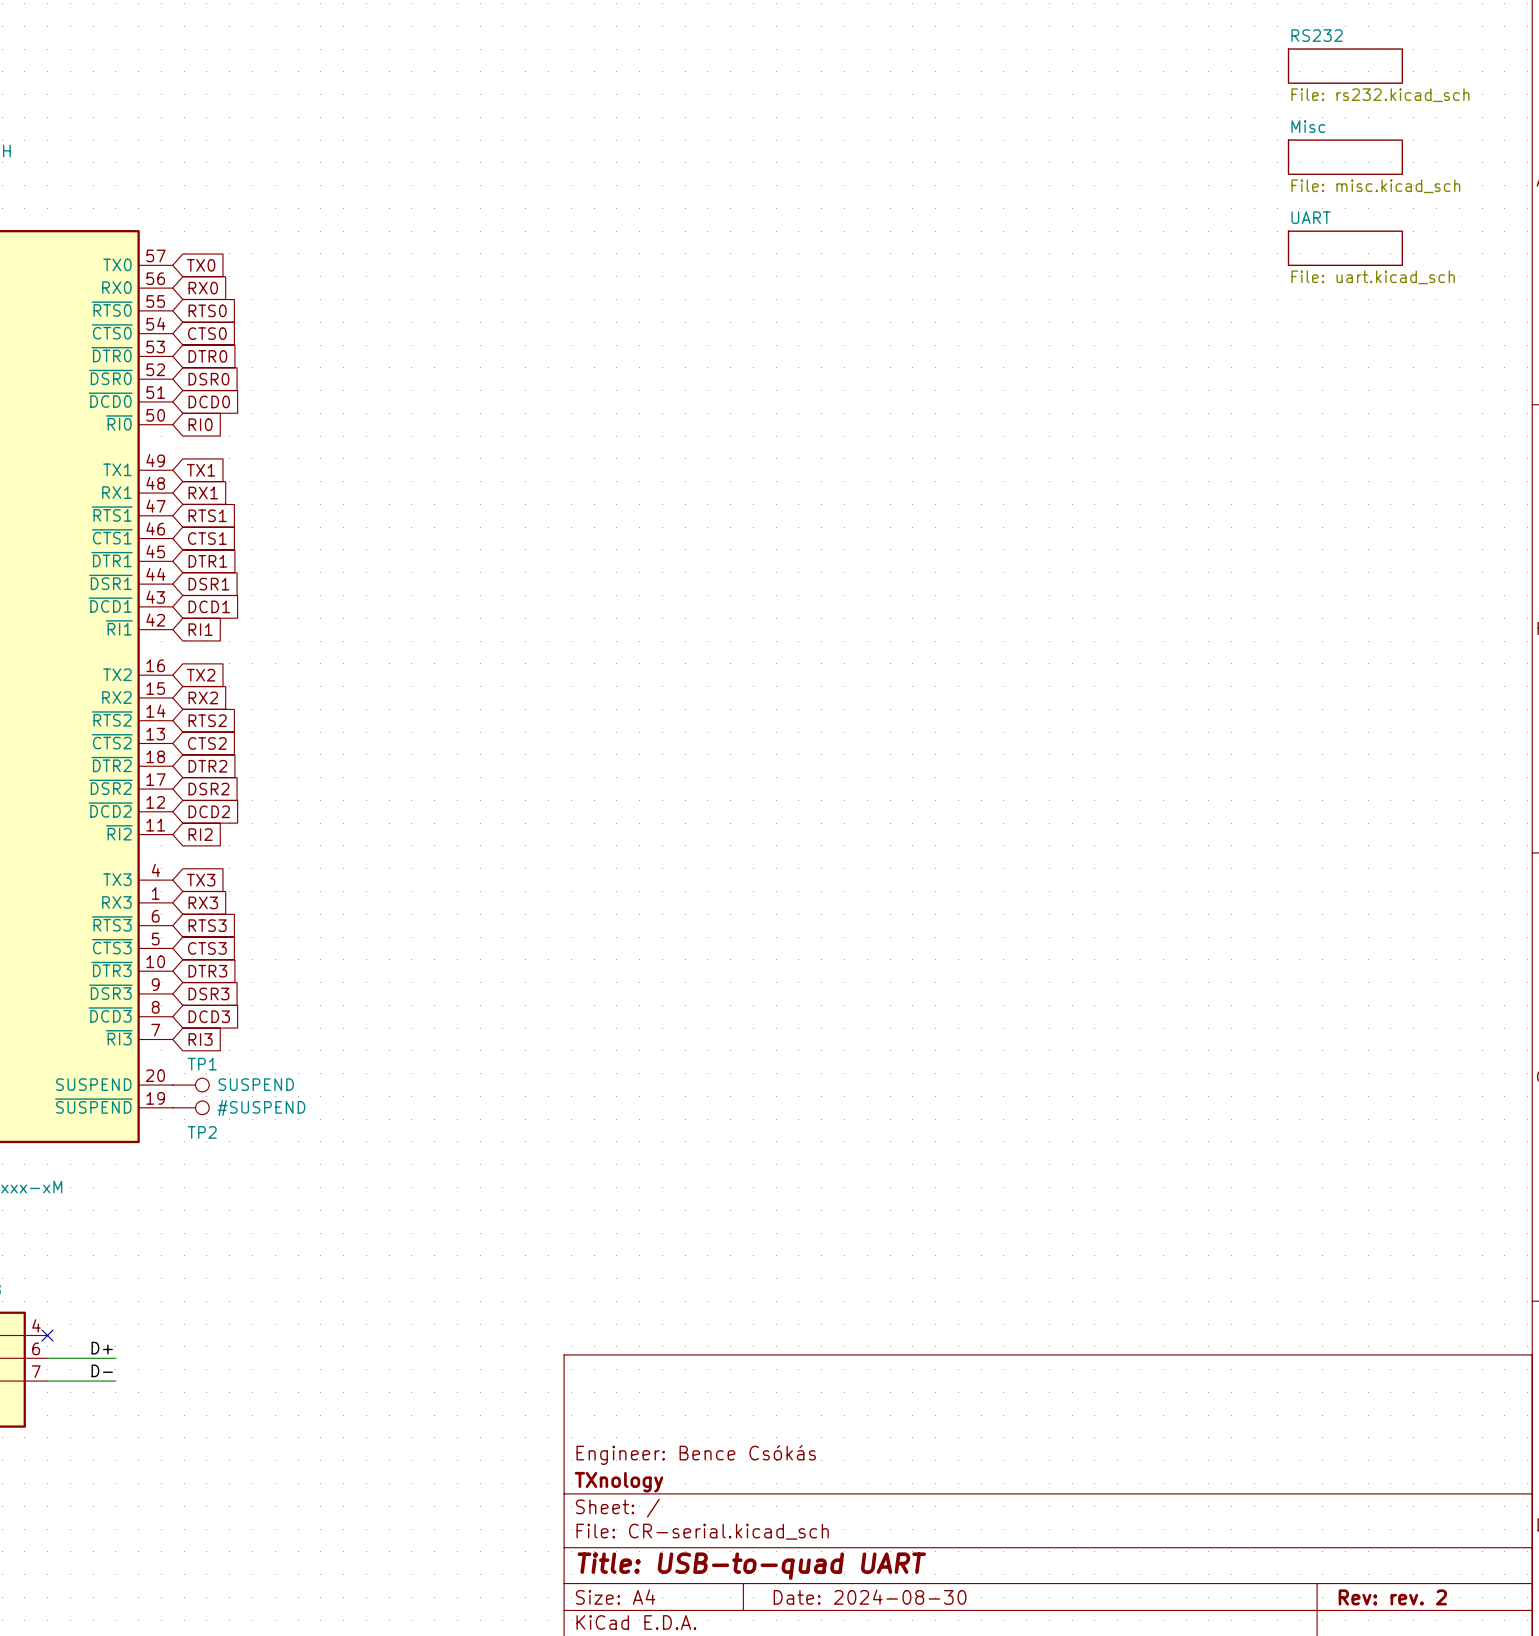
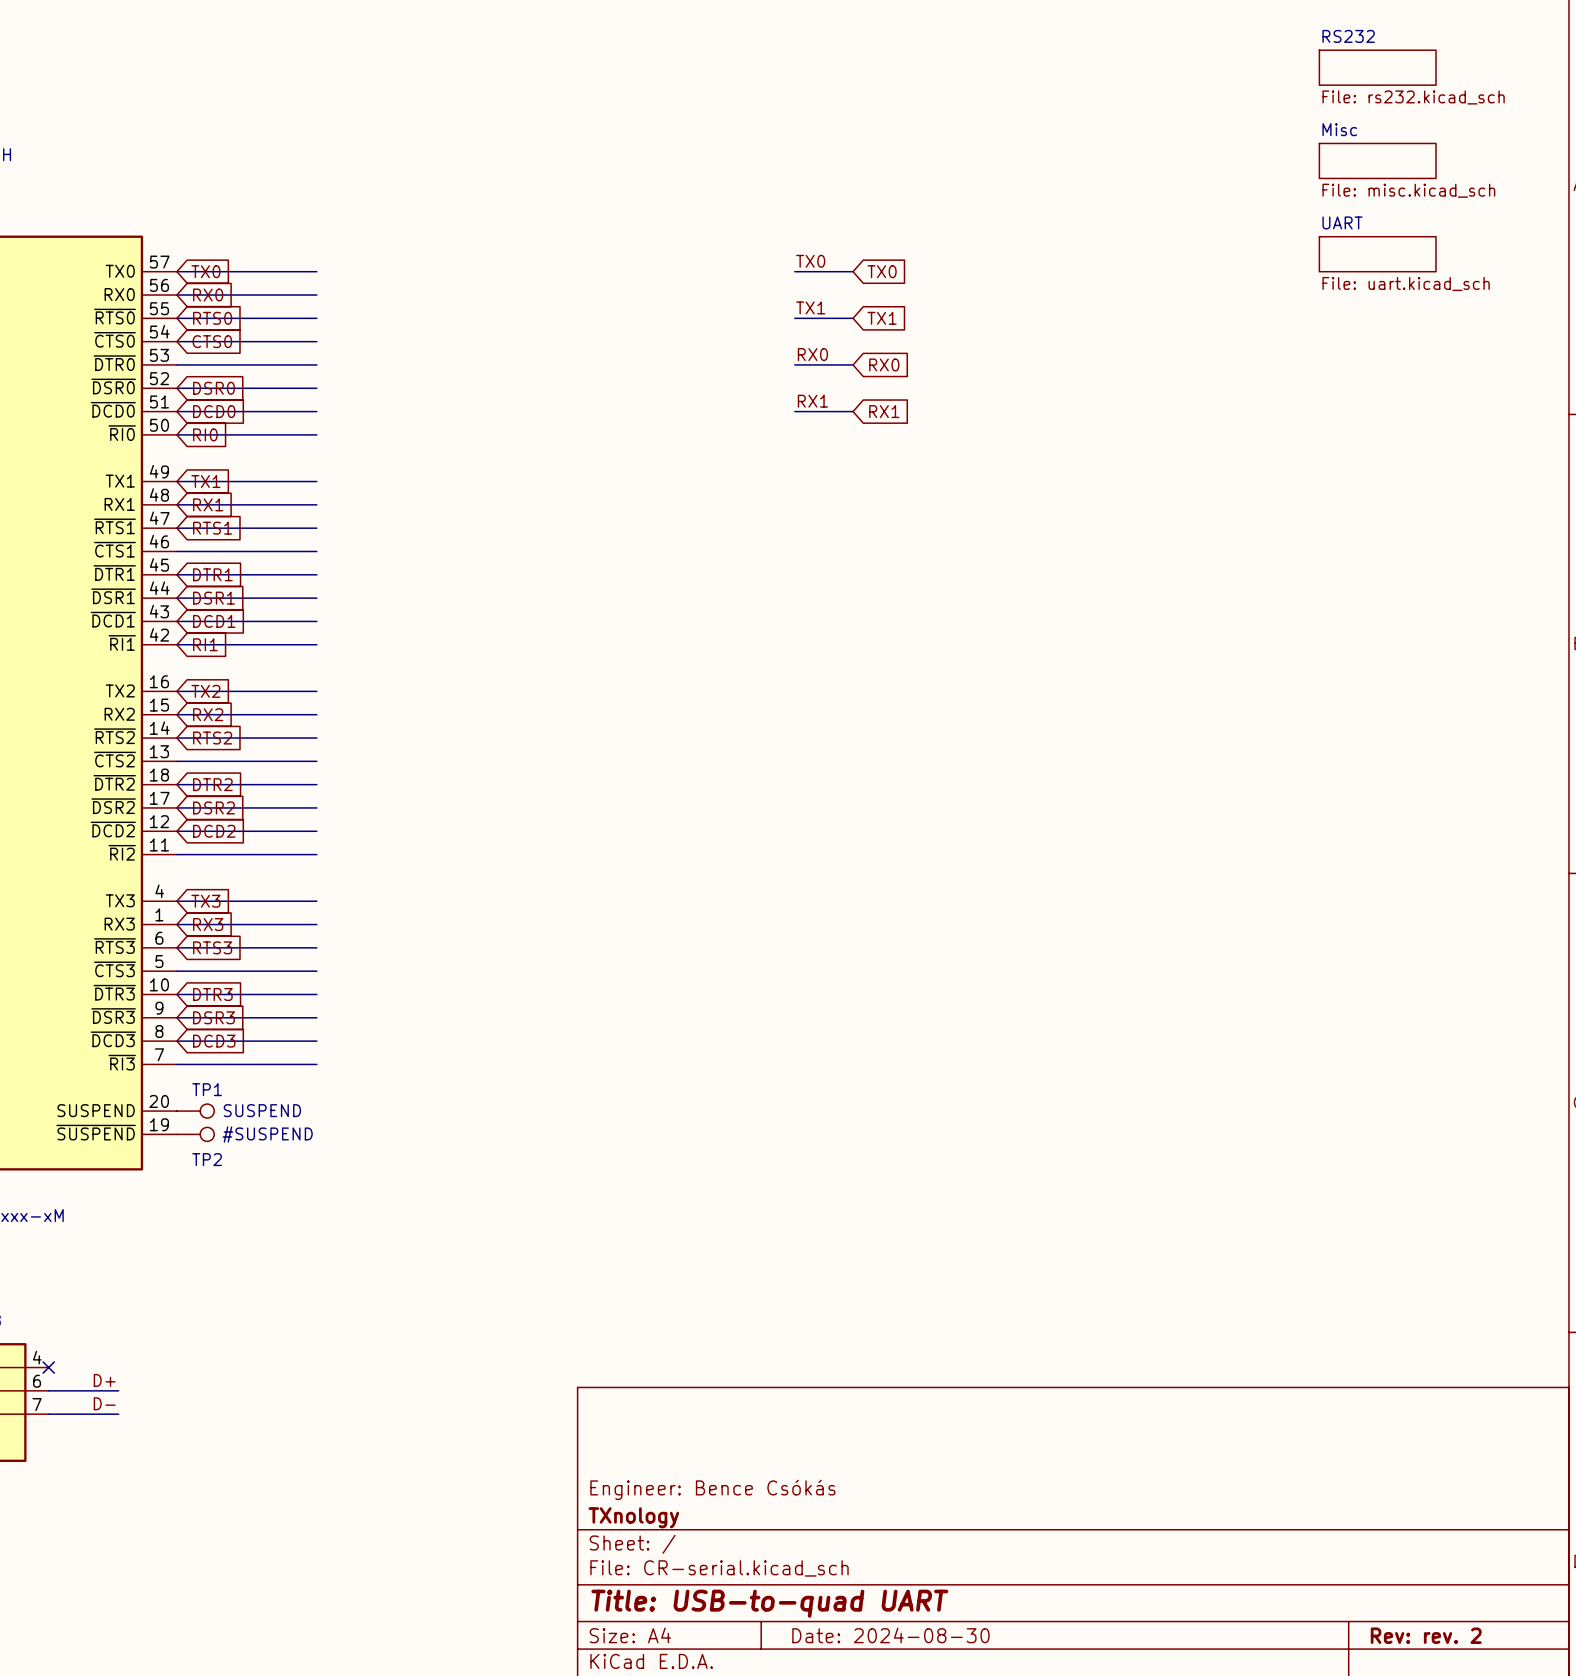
label: none -> TX0 (810, 261)
wire: none -> (176, 271) (316, 271)
wire: none -> (794, 271) (853, 271)
global label: none -> TX0 (882, 271)
wire: none -> (176, 295) (316, 295)
label: none -> TX1 (810, 307)
wire: none -> (176, 318) (316, 318)
wire: none -> (794, 318) (853, 318)
global label: none -> TX1 (882, 318)
wire: none -> (176, 341) (316, 341)
label: none -> RX0 (812, 354)
wire: none -> (176, 364) (316, 364)
global label: DTR0 (207, 356) -> none
wire: none -> (794, 364) (853, 364)
global label: none -> RX0 (884, 364)
wire: none -> (176, 388) (316, 388)
label: none -> RX1 (812, 401)
wire: none -> (176, 411) (316, 411)
wire: none -> (794, 411) (853, 411)
global label: none -> RX1 (884, 411)
wire: none -> (176, 434) (316, 434)
wire: none -> (176, 481) (316, 481)
wire: none -> (176, 504) (316, 504)
wire: none -> (176, 528) (316, 528)
wire: none -> (176, 551) (316, 551)
global label: CTS1 (207, 538) -> none
wire: none -> (176, 574) (316, 574)
wire: none -> (176, 598) (316, 598)
wire: none -> (176, 621) (316, 621)
wire: none -> (176, 644) (316, 644)
wire: none -> (176, 691) (316, 691)
wire: none -> (176, 714) (316, 714)
wire: none -> (176, 738) (316, 738)
wire: none -> (176, 761) (316, 761)
global label: CTS2 (207, 743) -> none
wire: none -> (176, 784) (316, 784)
wire: none -> (176, 807) (316, 807)
wire: none -> (176, 831) (316, 831)
wire: none -> (176, 854) (316, 854)
global label: RI2 (200, 834) -> none
wire: none -> (176, 901) (316, 901)
wire: none -> (176, 924) (316, 924)
wire: none -> (176, 947) (316, 947)
wire: none -> (176, 971) (316, 971)
global label: CTS3 (207, 948) -> none
wire: none -> (176, 994) (316, 994)
wire: none -> (176, 1017) (316, 1017)
wire: none -> (176, 1041) (316, 1041)
wire: none -> (176, 1064) (316, 1064)
global label: RI3 (200, 1039) -> none

